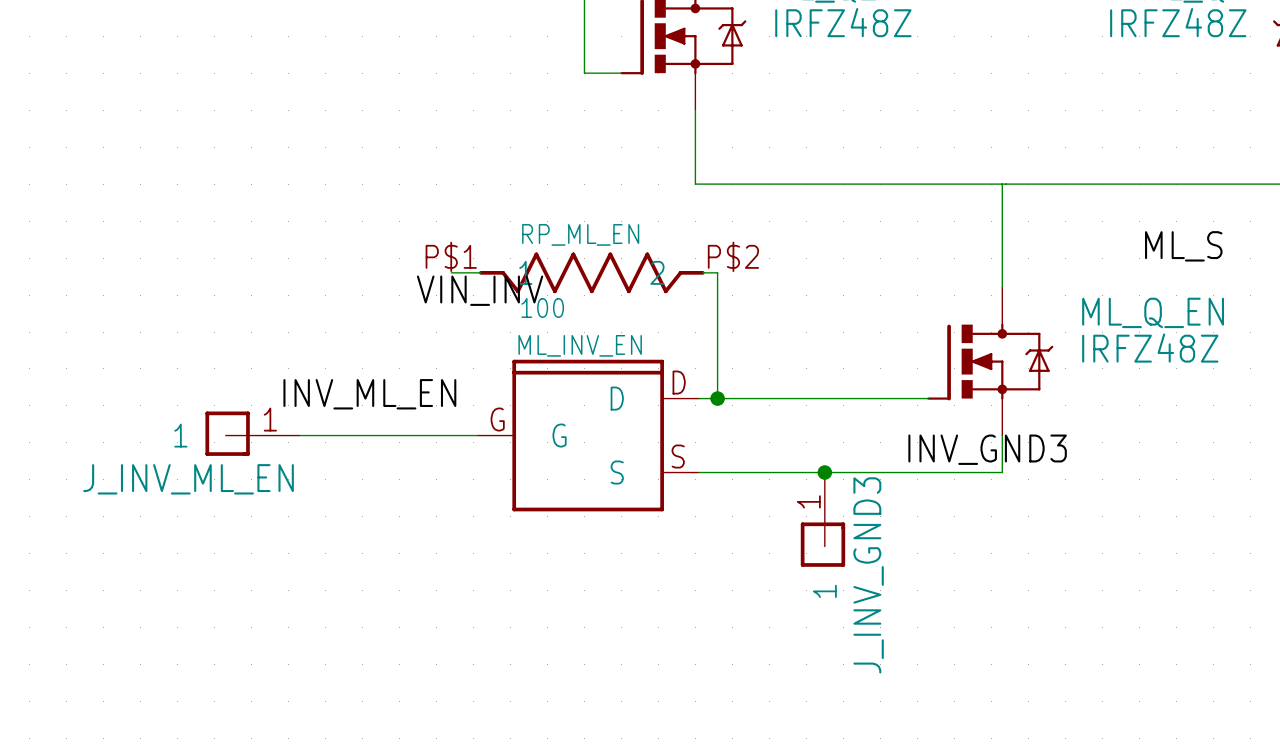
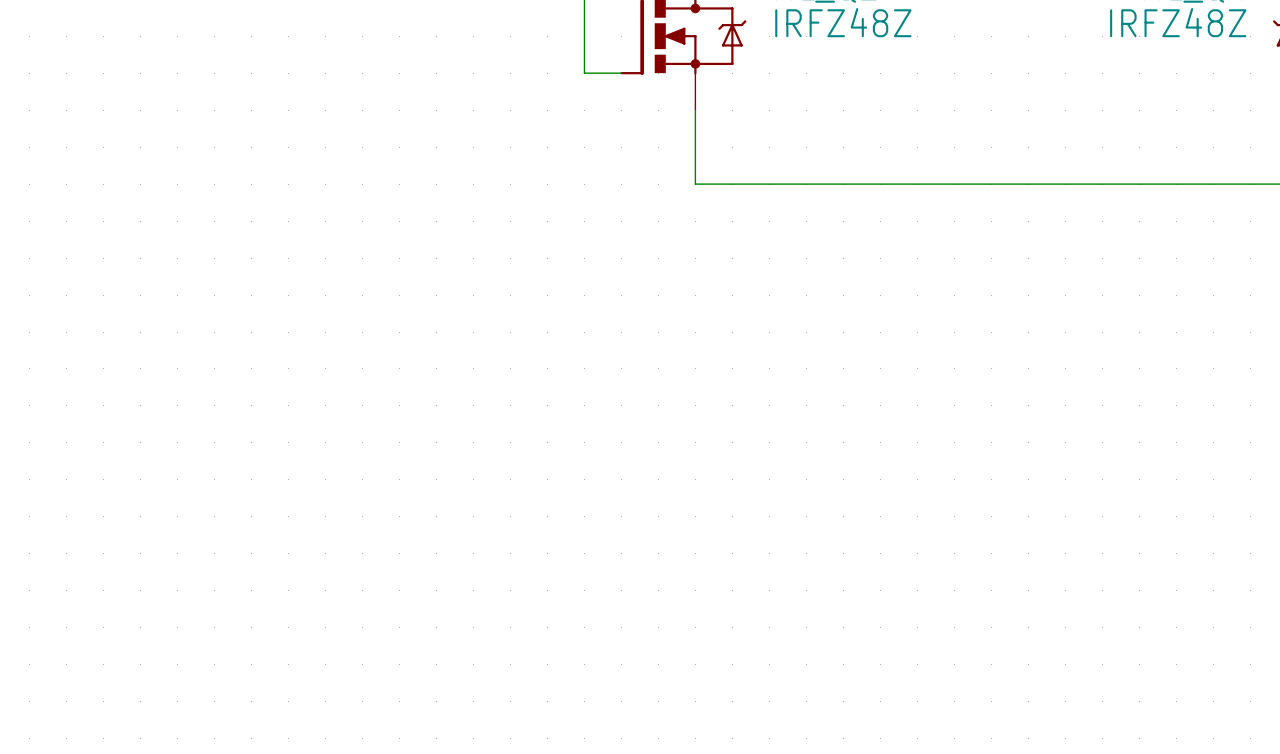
wire: (1002, 184) (1002, 287) -> none
label: ML_S (1183, 246) -> none
wire: (451, 272) (480, 272) -> none
RP_ML_EN: 100 (591, 272) -> none
wire: (702, 272) (717, 272) (717, 398) -> none
label: VIN_INV (480, 290) -> none
ML_Q_EN: IRFZ48Z (990, 361) -> none
label: INV_ML_EN (369, 394) -> none
wire: (699, 398) (928, 398) -> none
junction: (717, 398) -> none
J_INV_ML_EN: (252, 433) -> none
wire: (299, 435) (477, 435) -> none
ML_INV_EN: (588, 435) -> none
wire: (1002, 435) (1002, 472) (699, 472) -> none
label: INV_GND3 (987, 449) -> none
junction: (824, 472) -> none
J_INV_GND3: (822, 519) -> none

